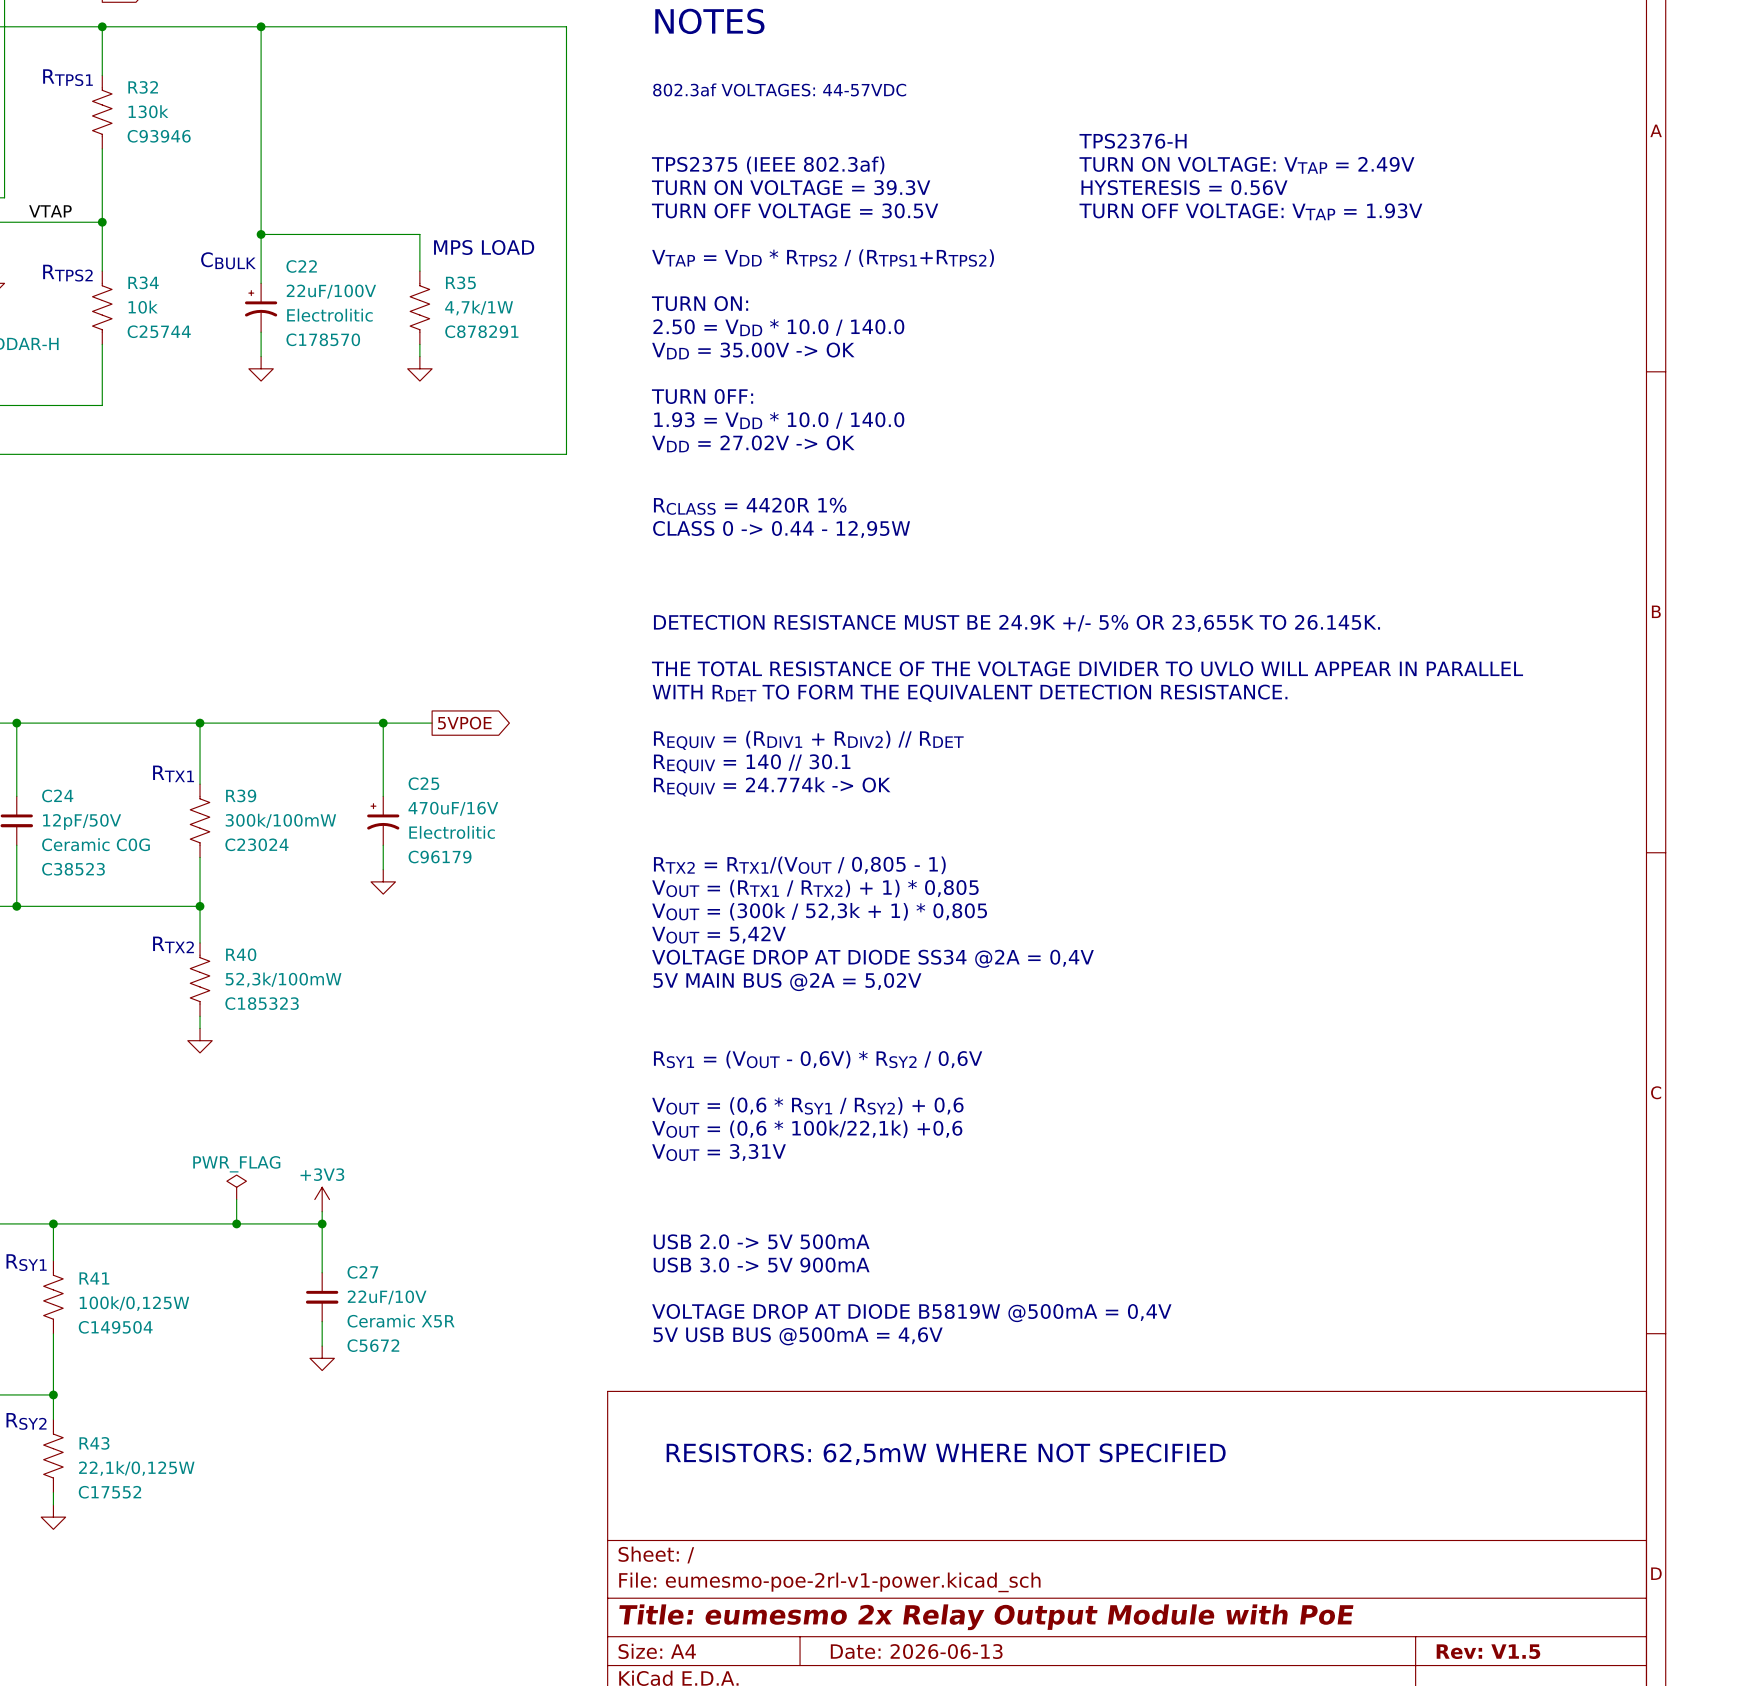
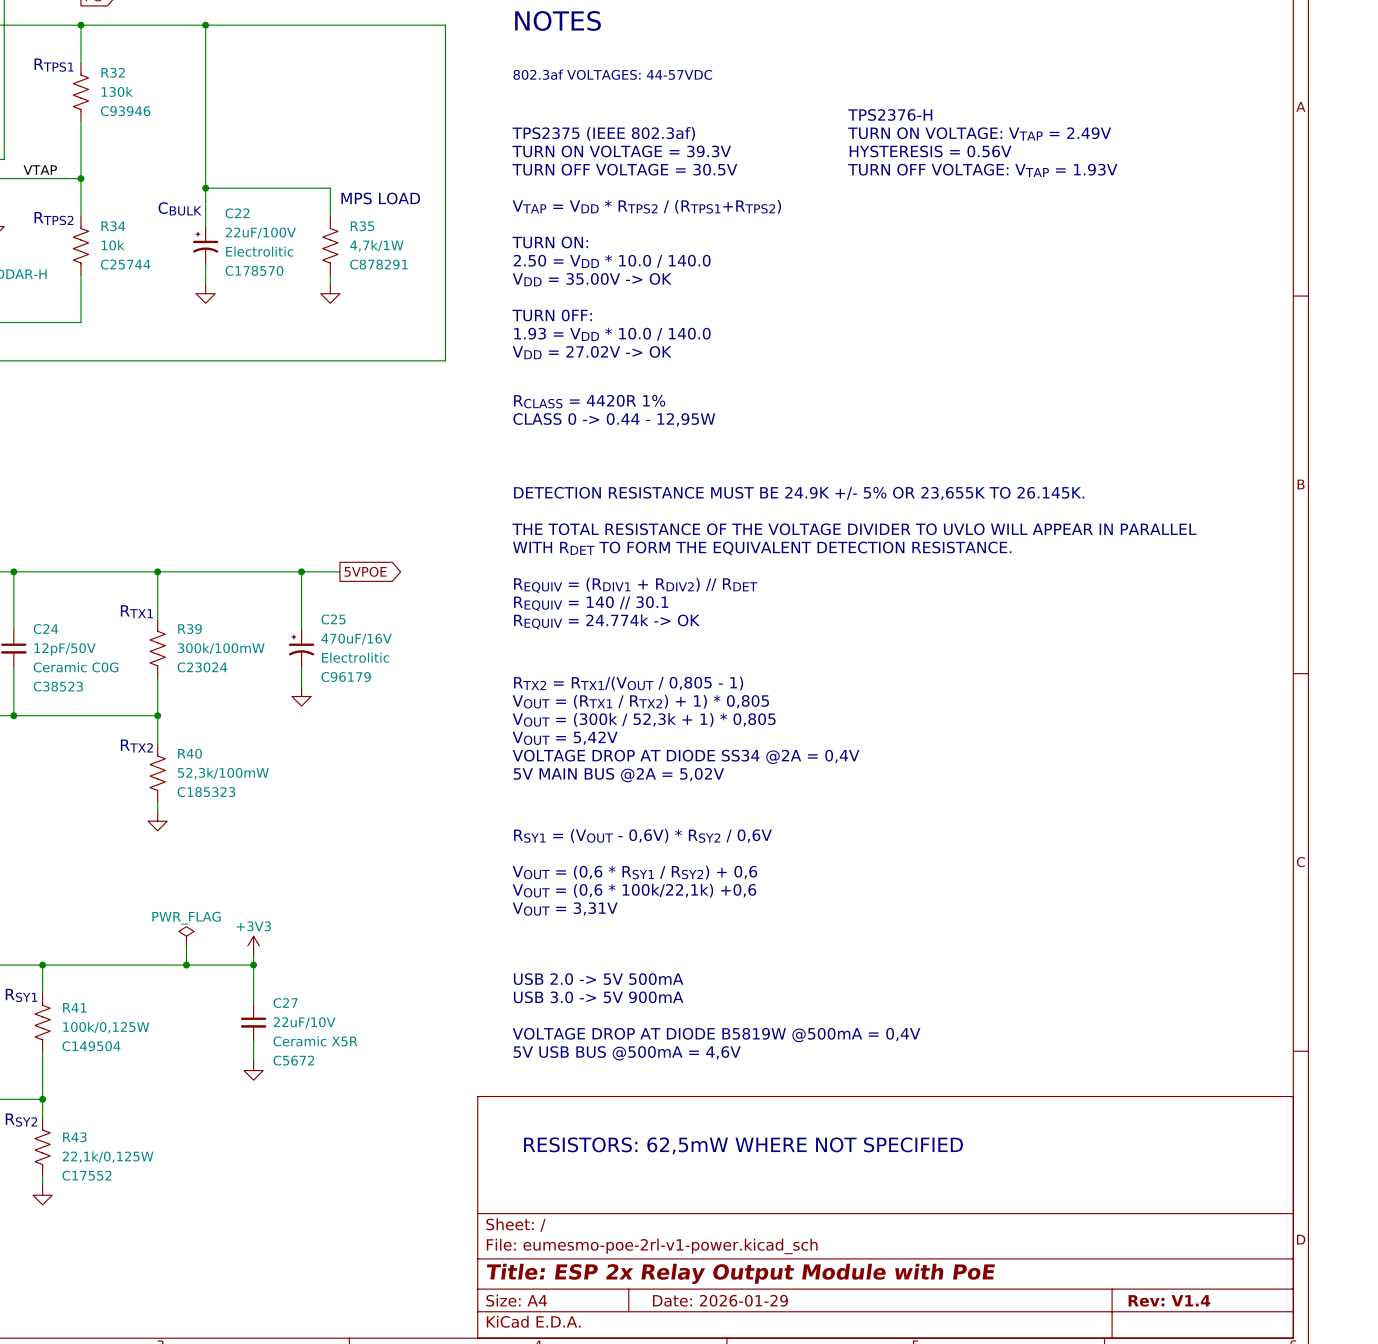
title block: Title: eumesmo 2x Relay Output Module with PoE (986, 1617) -> Title: ESP 2x Relay Output Module with PoE (740, 1273)
title block: Date: 2026-06-13 (916, 1651) -> Date: 2026-01-29 (720, 1300)
title block: Rev: V1.5 (1488, 1651) -> Rev: V1.4 (1169, 1300)

